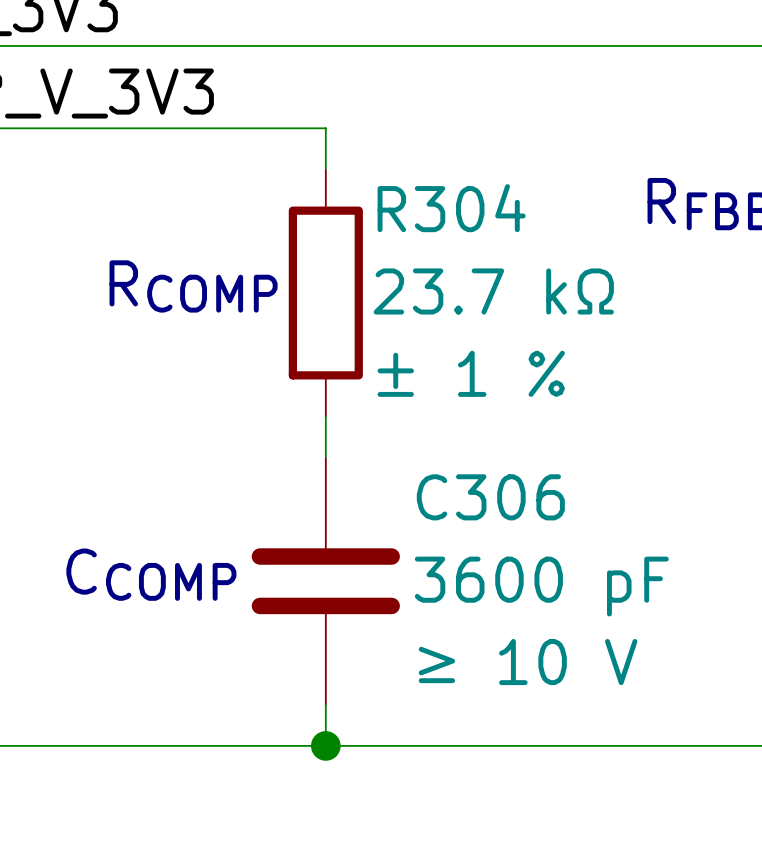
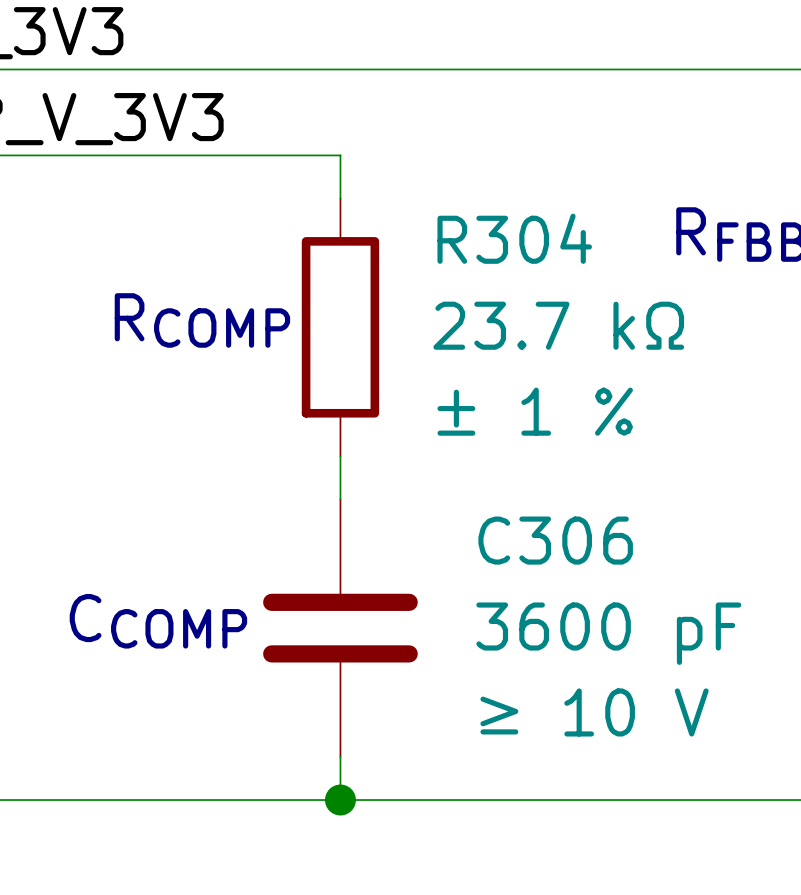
R304 name position: R304 (451, 208) -> R304 (514, 238)
R304 value position: 23.7 kΩ (493, 291) -> 23.7 kΩ (558, 325)
R304 text position: ± 1 % (471, 373) -> ± 1 % (535, 411)
C306 name position: C306 (490, 497) -> C306 (555, 540)
C306 value position: 3600 pF (541, 586) -> 3600 pF (608, 633)
C306 text position: ≥ 10 V (528, 662) -> ≥ 10 V (594, 712)

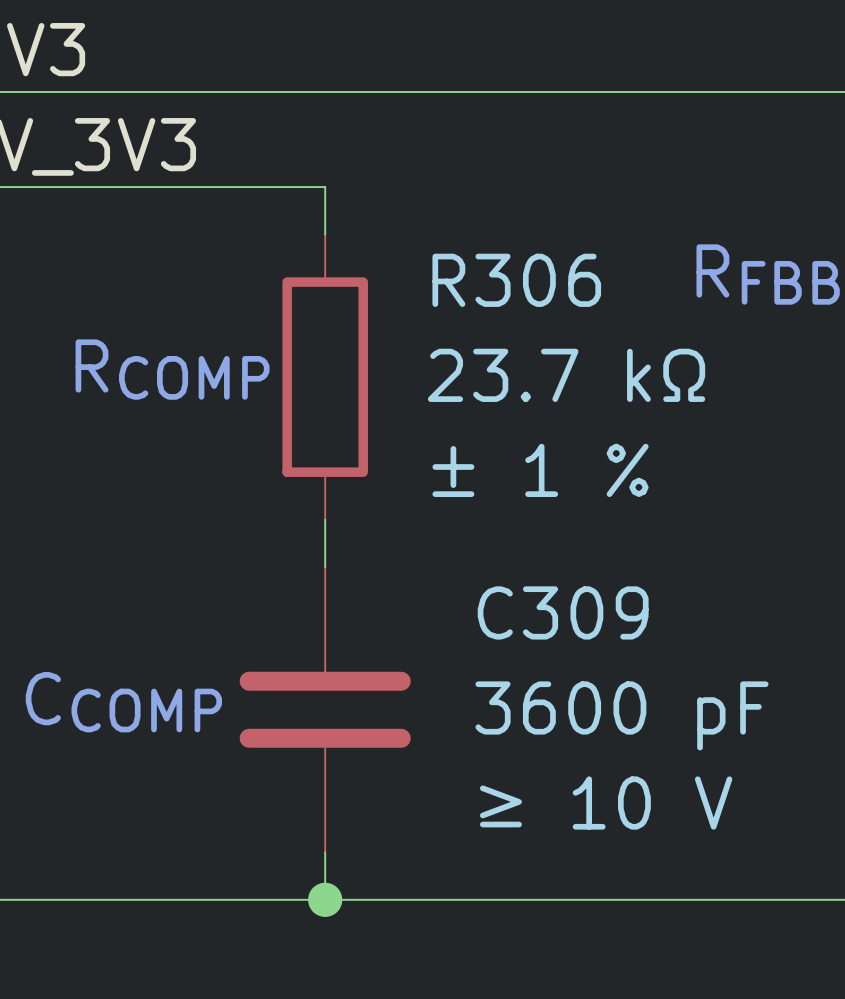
R304 name: R304 (514, 238) -> R306 (516, 280)
C306 name: C306 (555, 540) -> C309 (563, 612)

